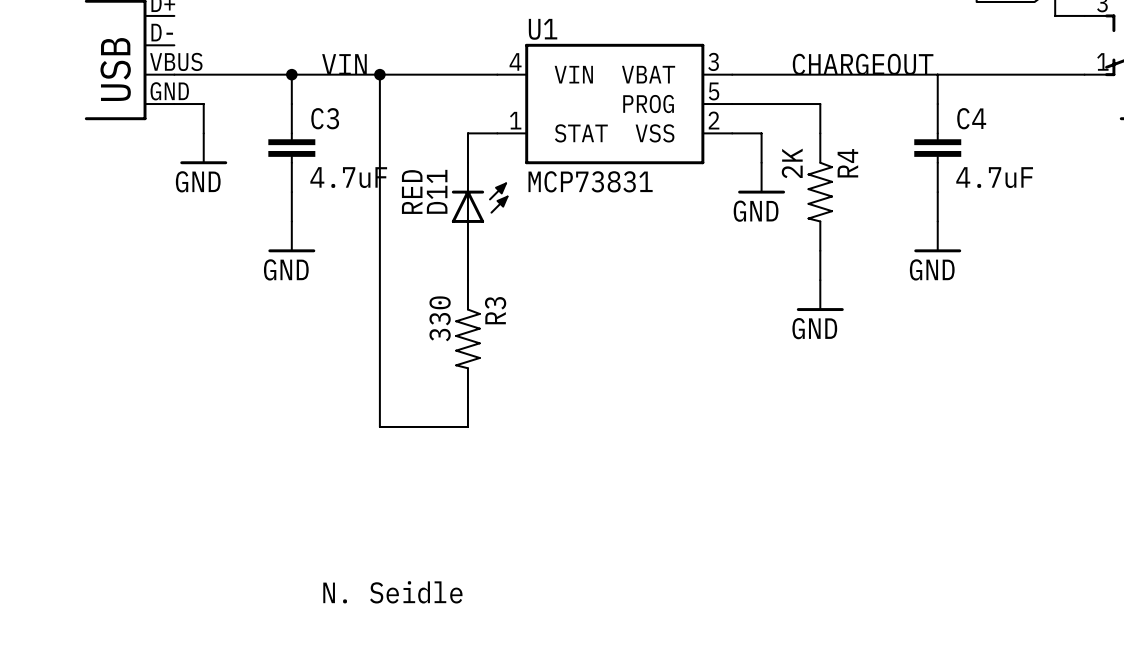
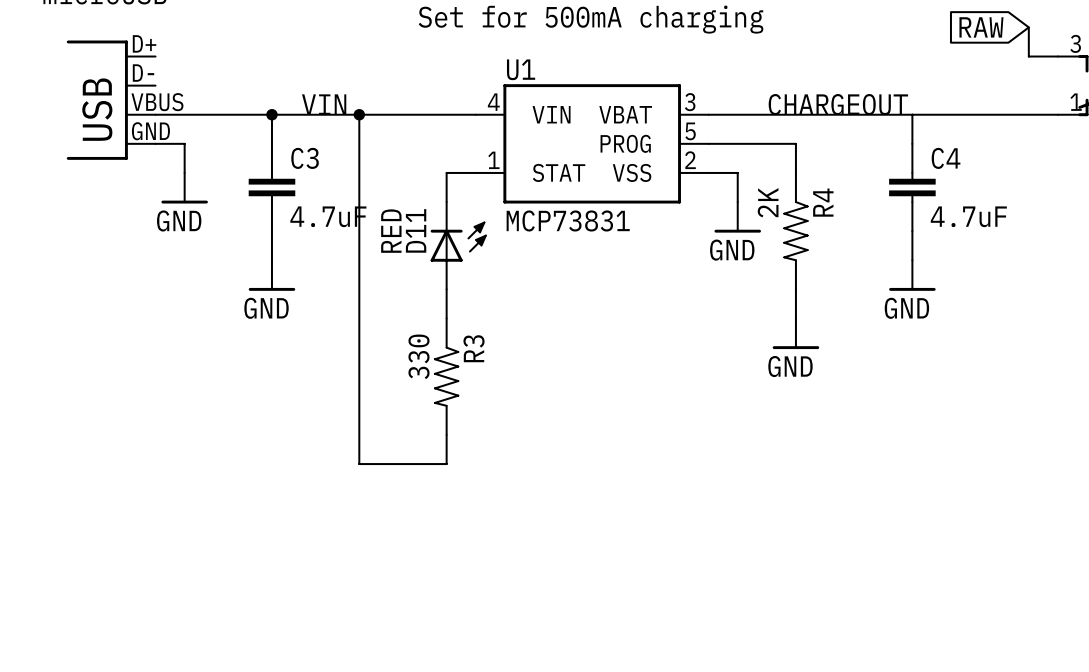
text: N. Seidle (392, 592) -> none

